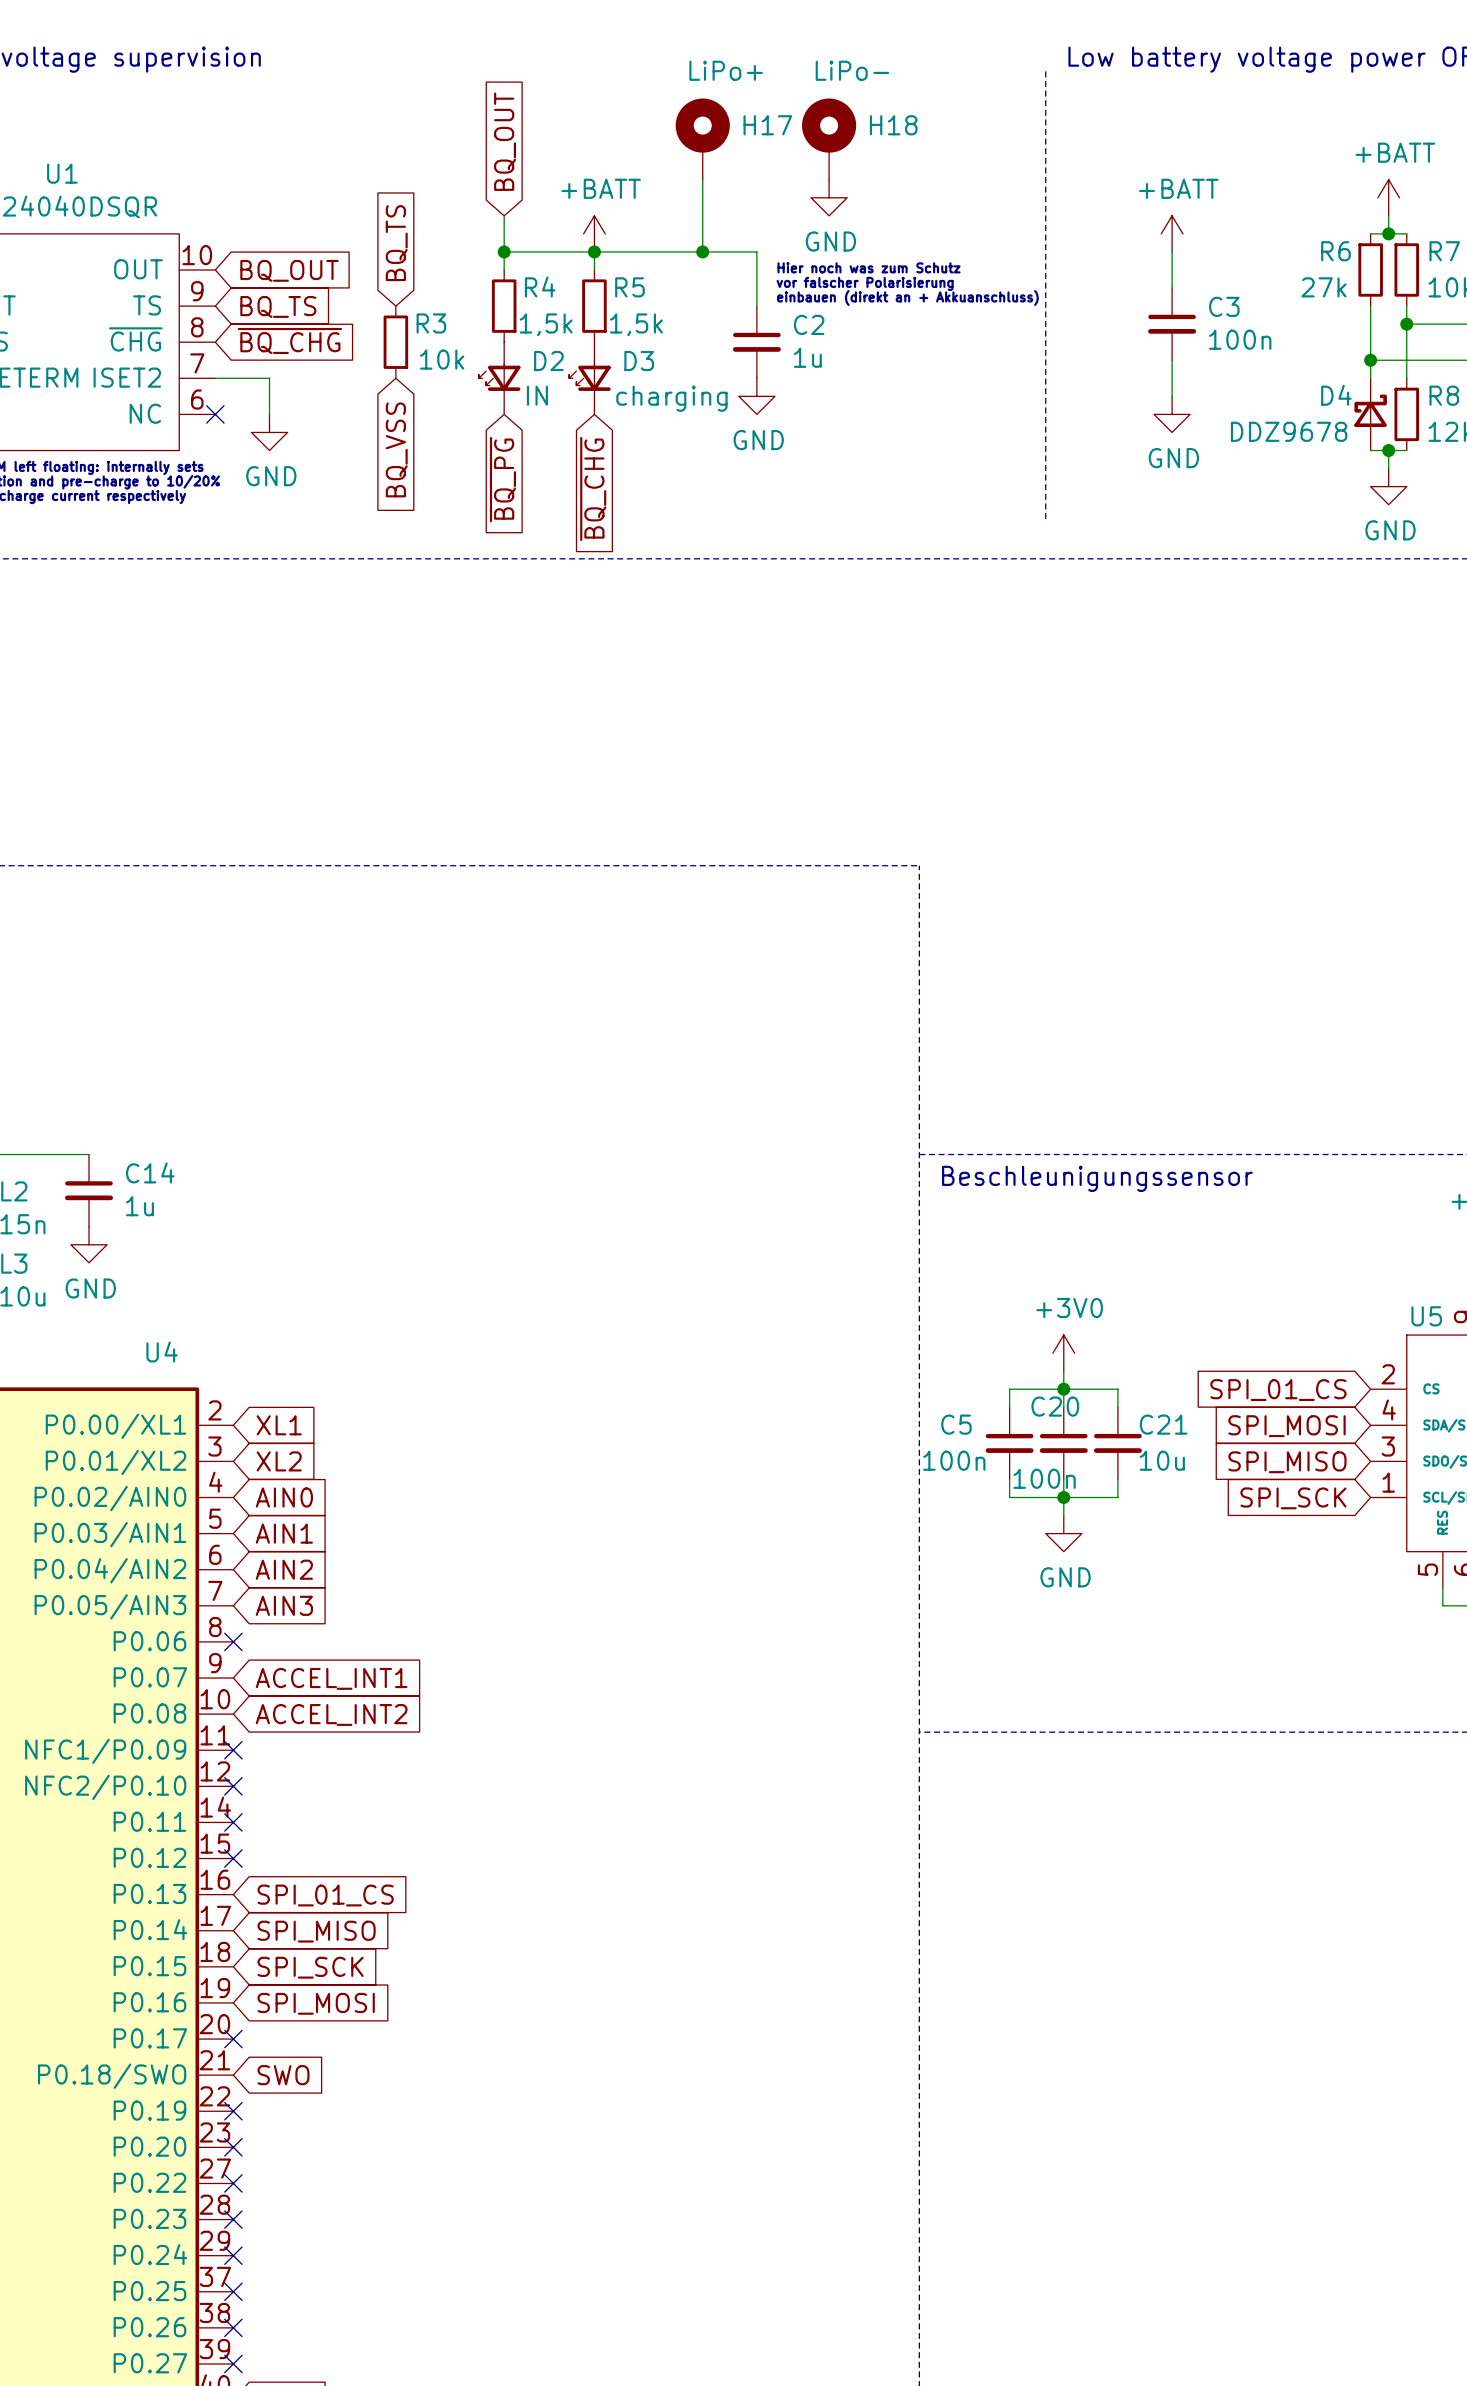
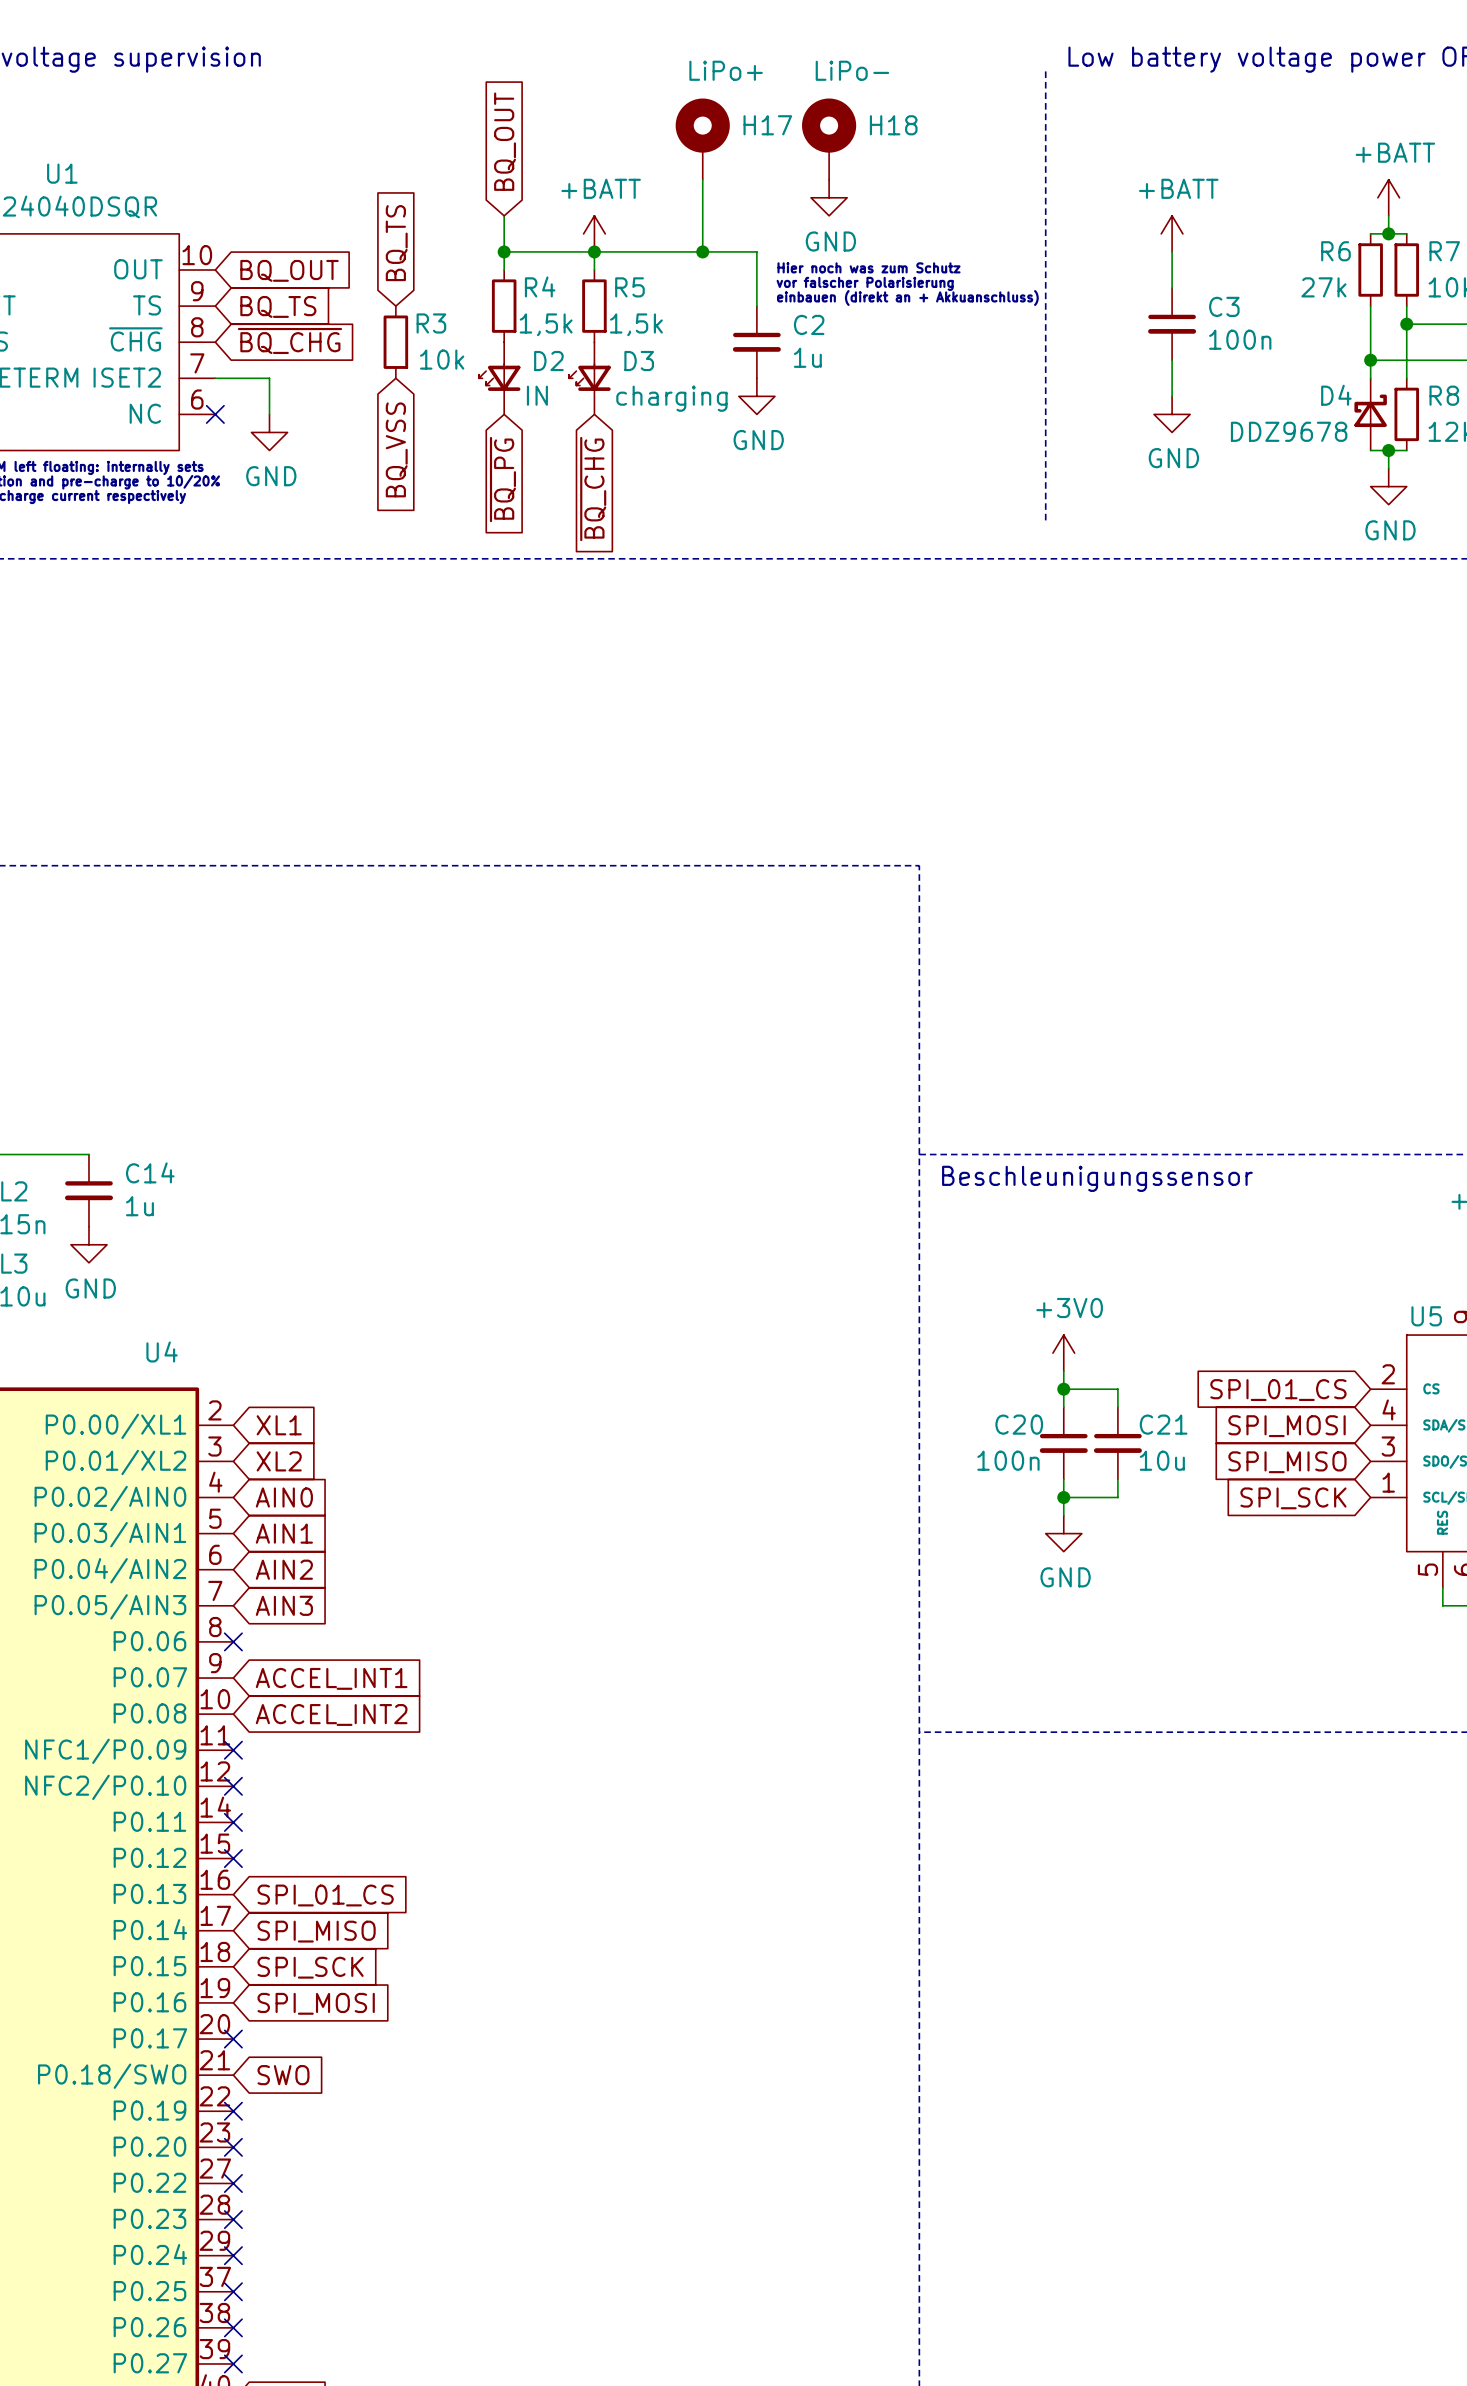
wire: (1063, 1389) (1009, 1389) (1009, 1407) -> none
C20 name position: C20 (1055, 1406) -> C20 (1019, 1424)
C5: 100n (1009, 1443) -> none
C20 value position: 100n (1044, 1478) -> 100n (1008, 1460)
wire: (1009, 1479) (1009, 1497) (1063, 1497) -> none

